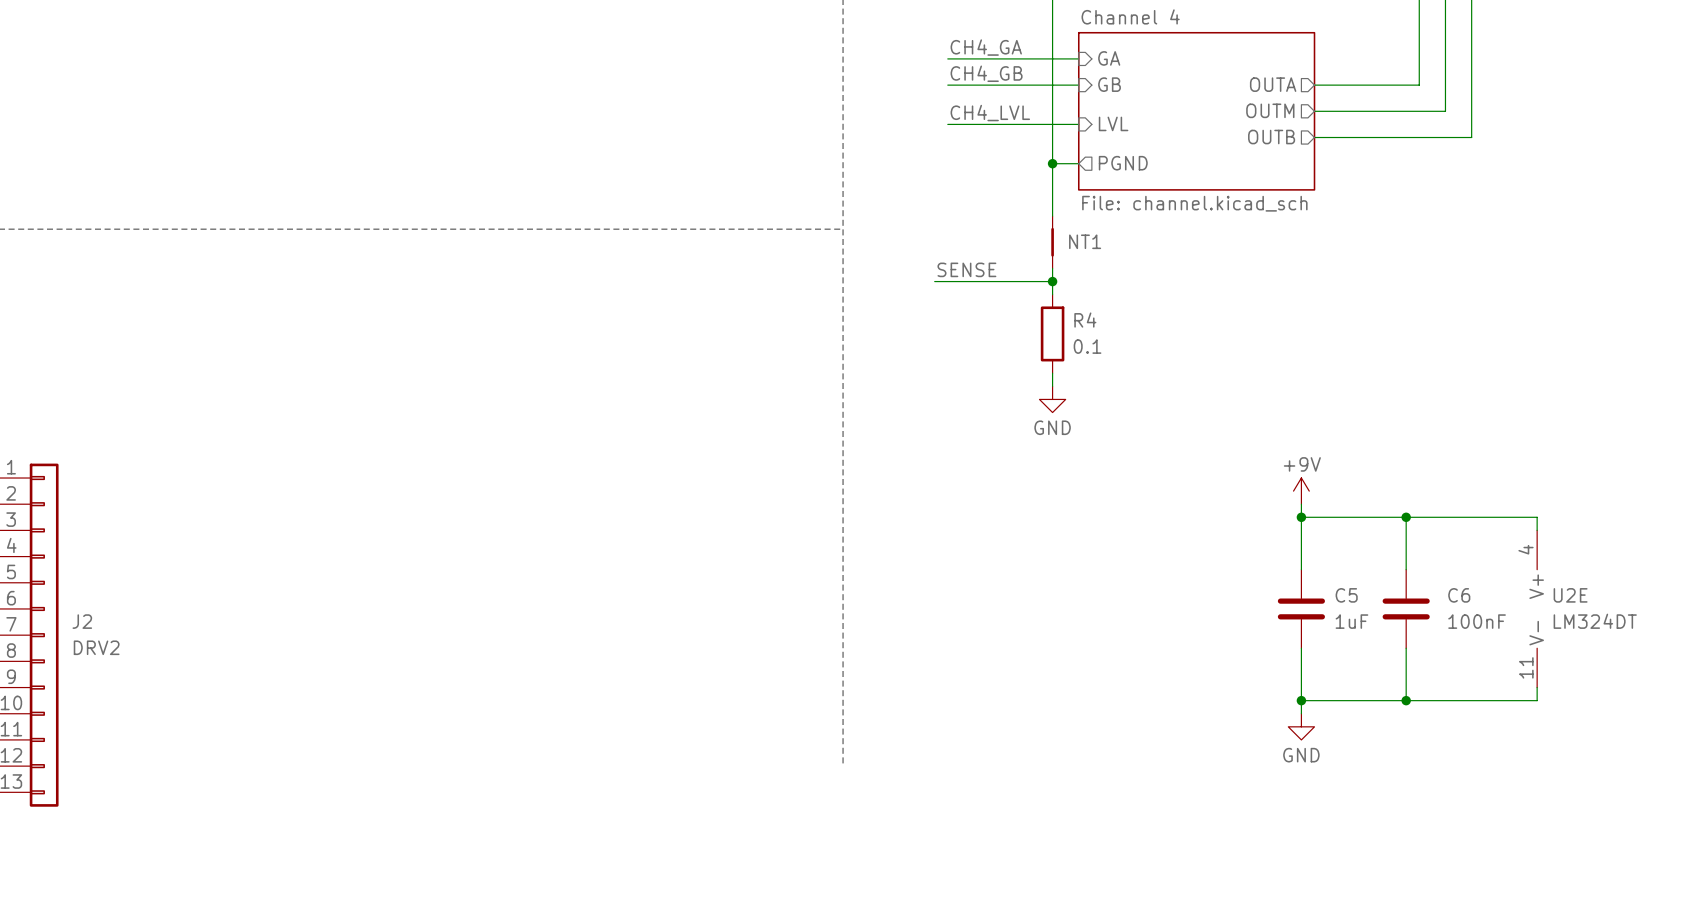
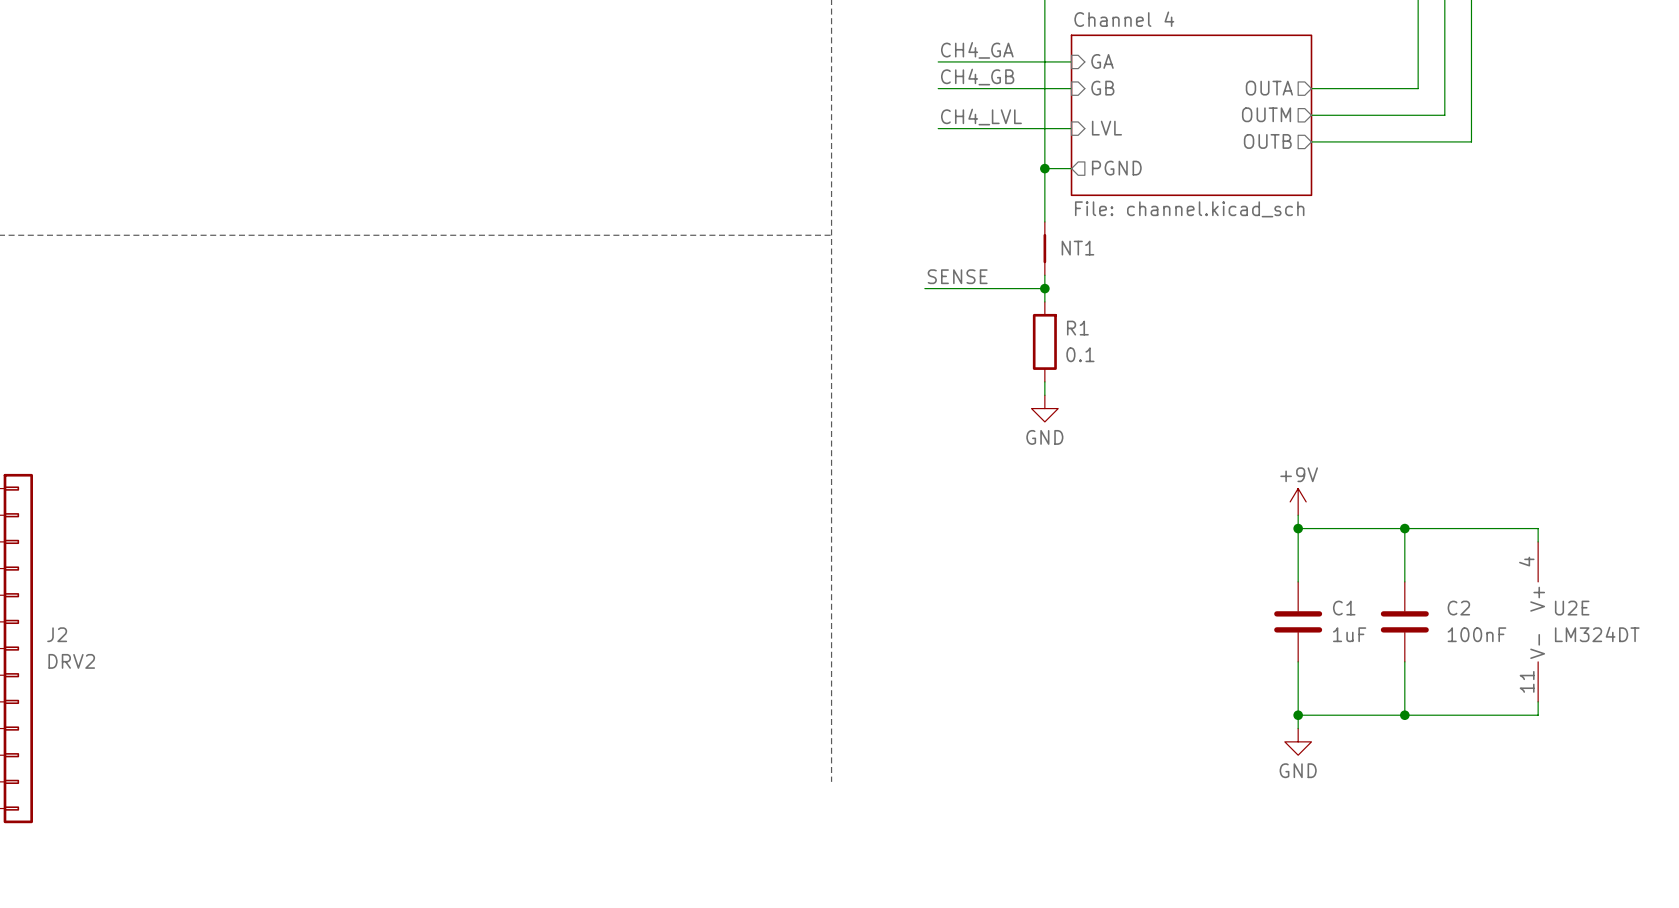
R4 name: R4 (1085, 320) -> R1 (1077, 328)
C5 name: C5 (1346, 595) -> C1 (1344, 608)
C6 name: C6 (1459, 595) -> C2 (1458, 608)

